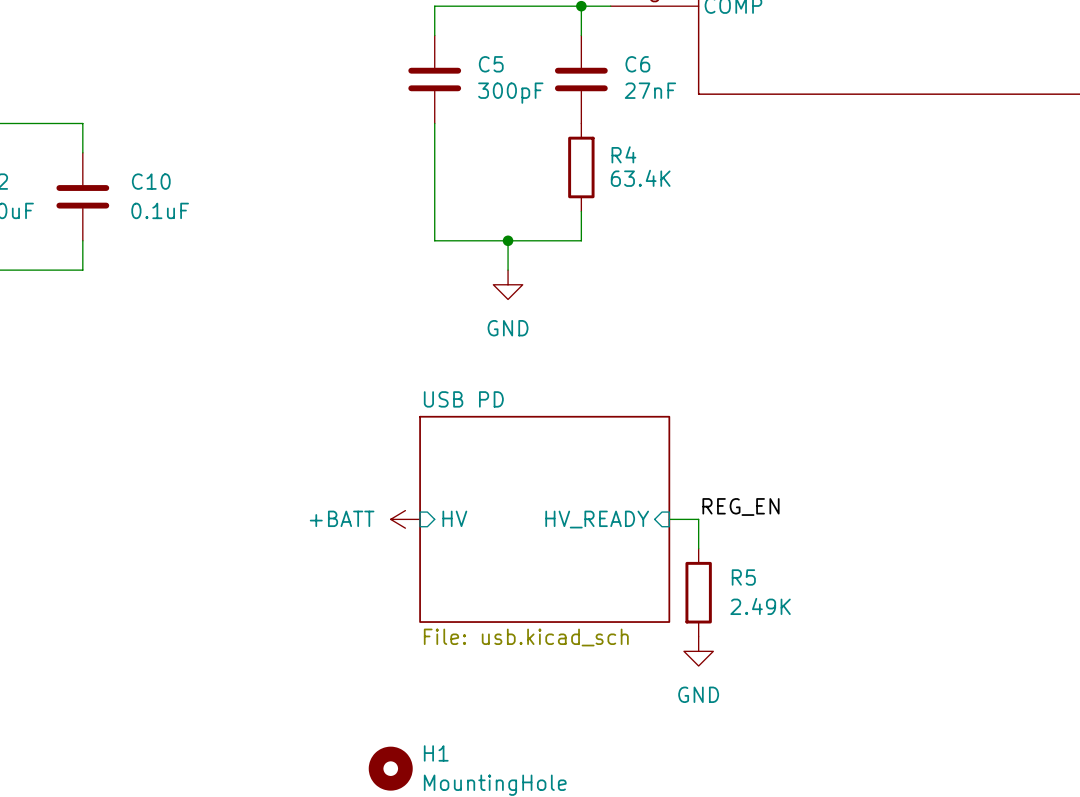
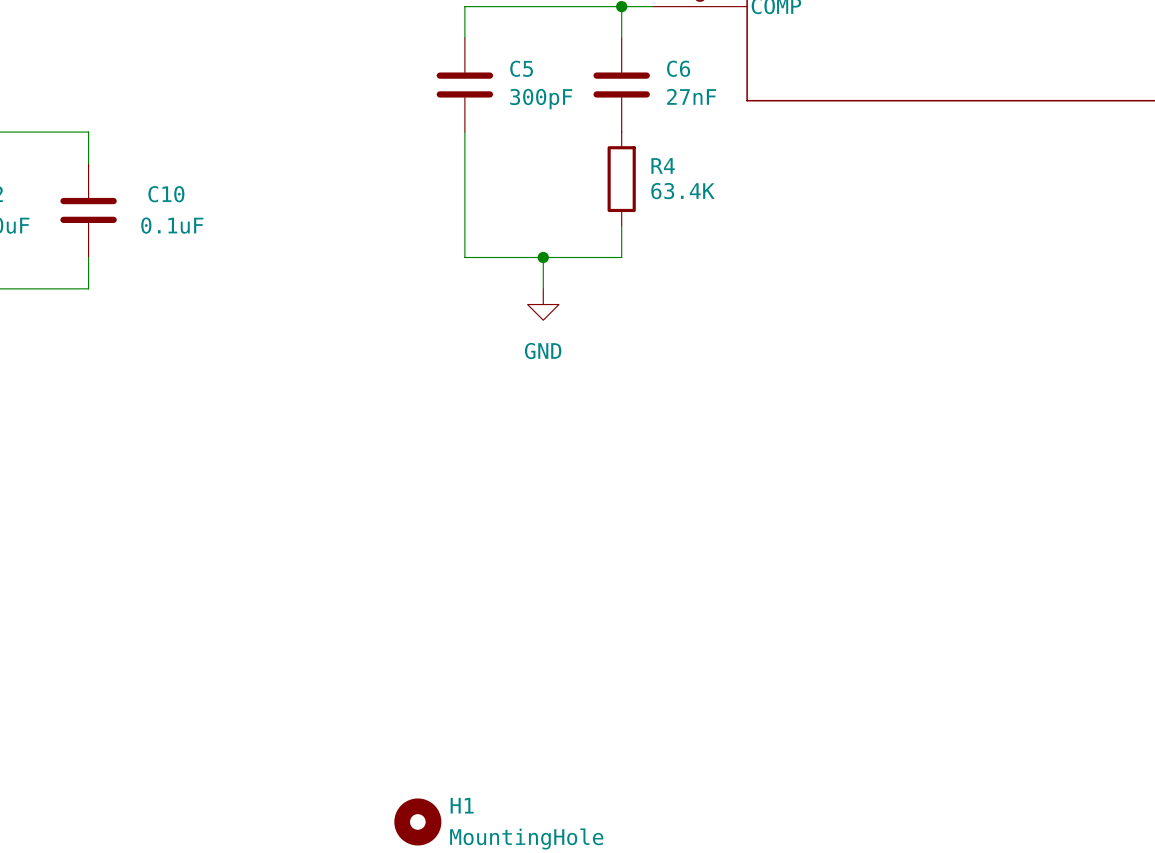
label: REG_EN (741, 506) -> none
sheet pin: HV (454, 518) -> none
power symbol: +BATT (405, 519) -> none
sheet USB PD: File: usb.kicad_sch (544, 519) -> none
sheet pin: HV_READY (597, 519) -> none
wire: (669, 519) (698, 519) (698, 548) -> none
R5: 2.49K (698, 592) -> none
power symbol: GND (698, 651) -> none

